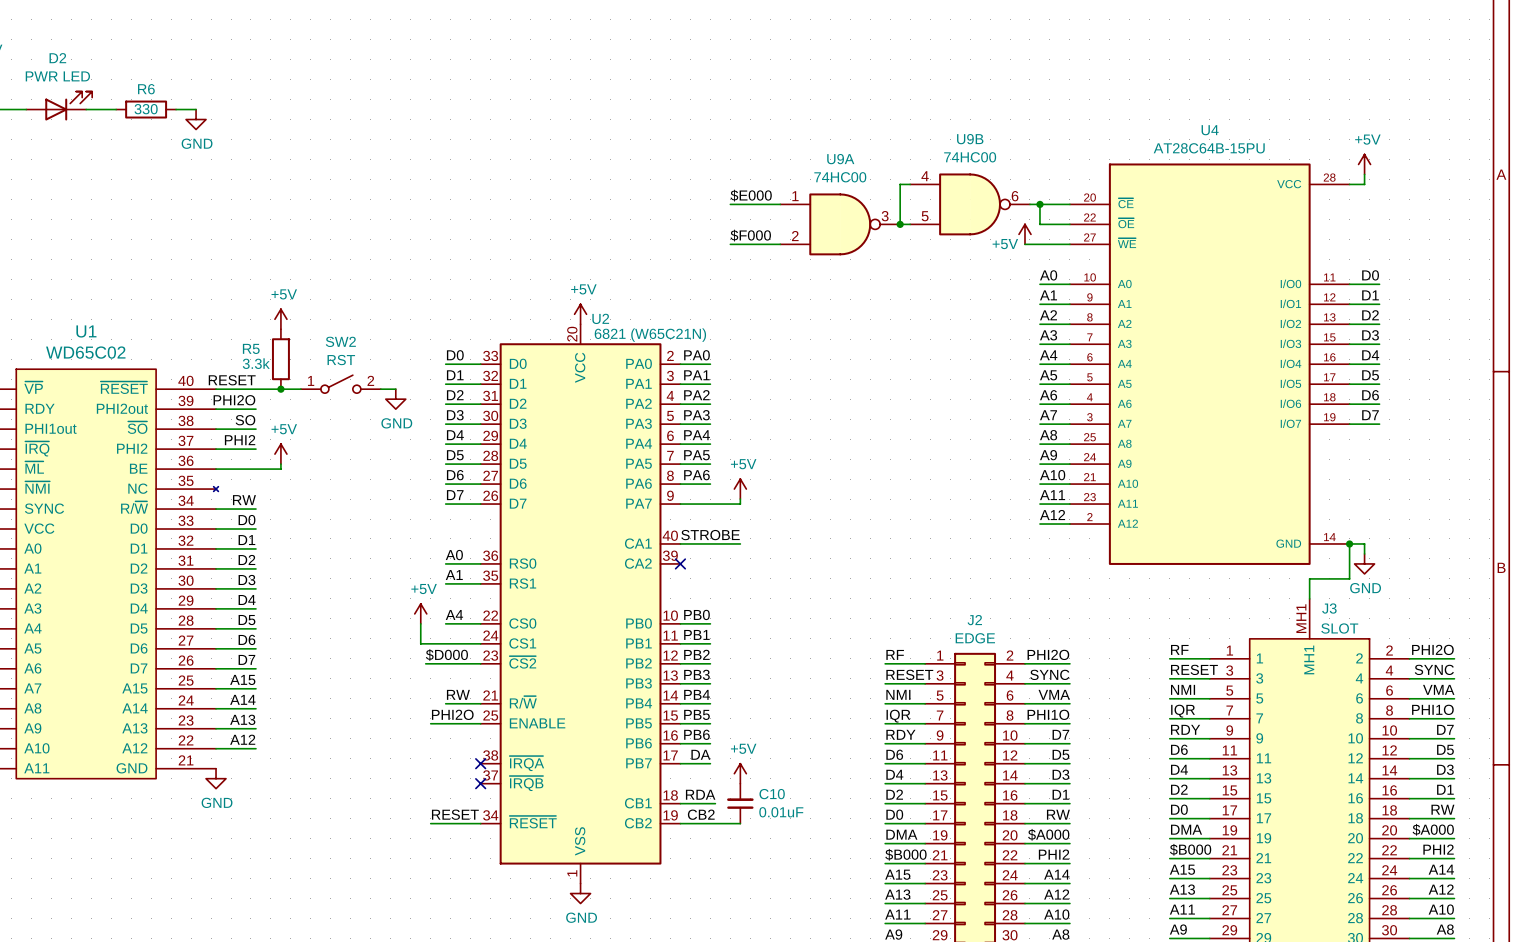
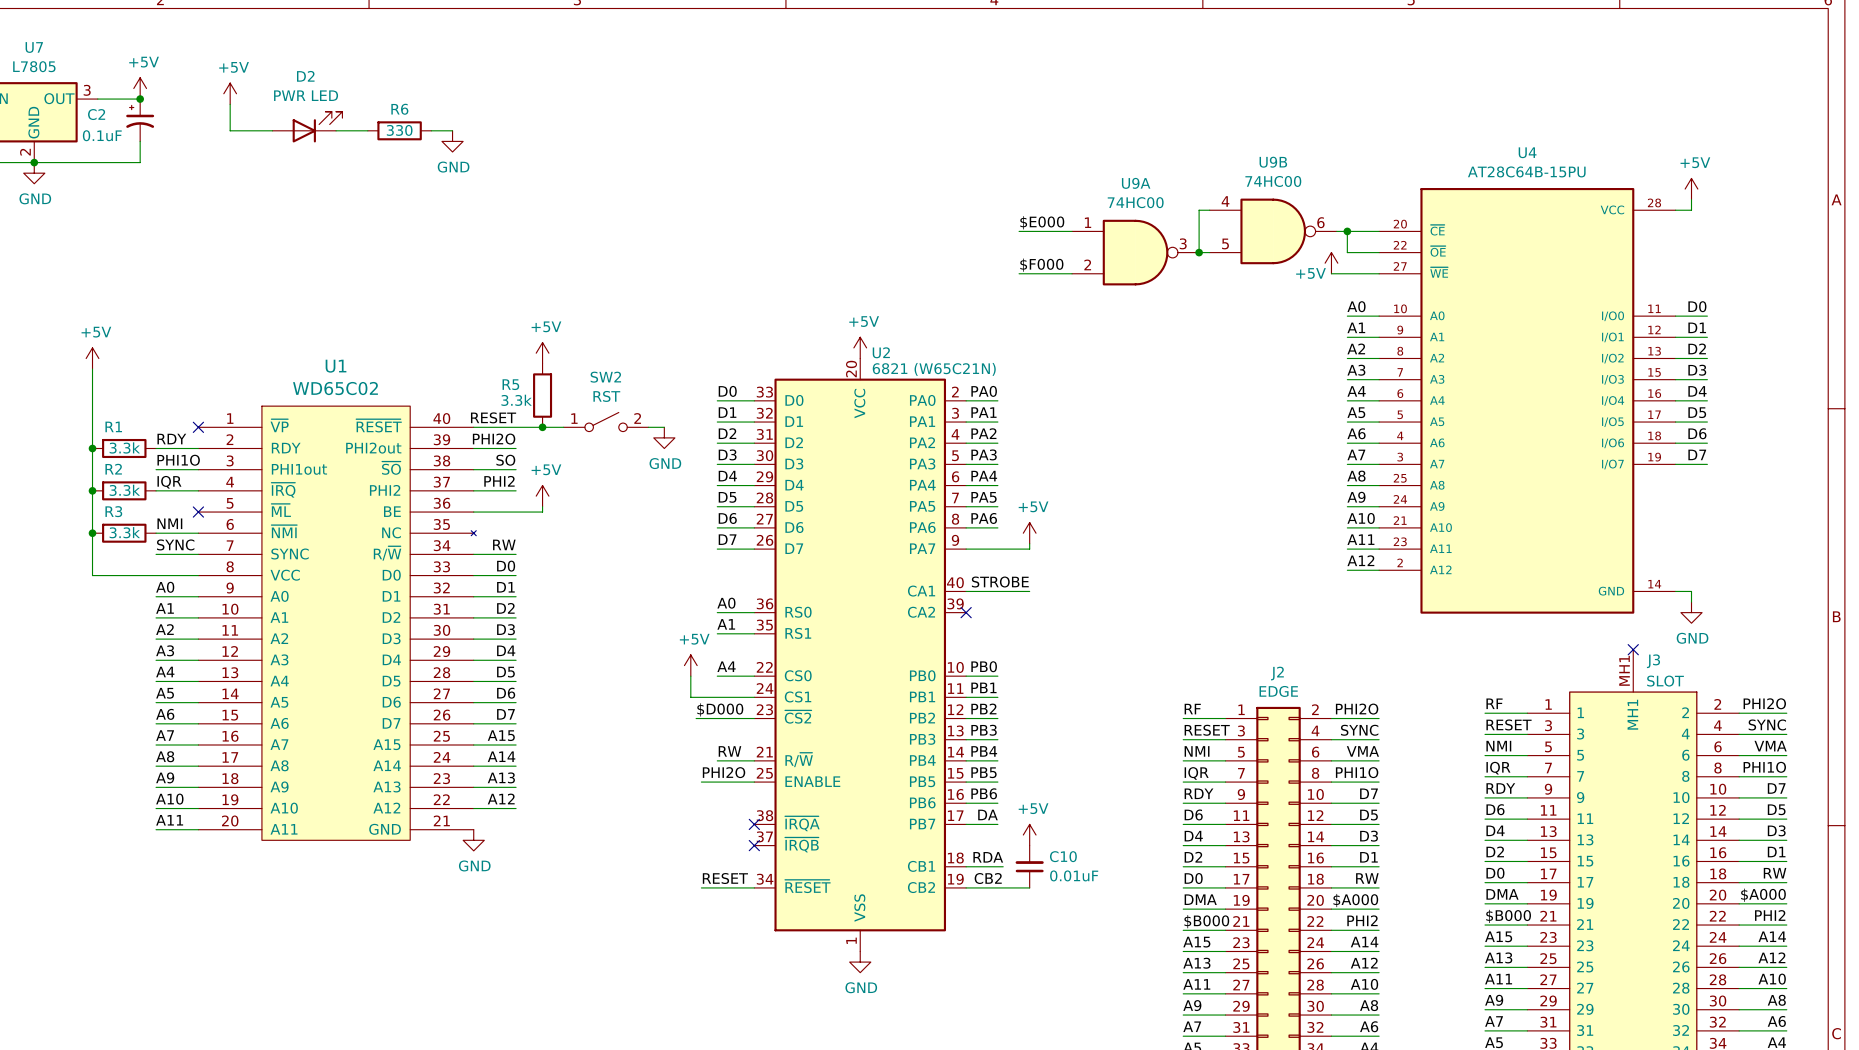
wire: (1349, 543) (1349, 578) (1309, 578) (1309, 598) -> none
junction: (1349, 543) -> none
no-connect mark: none -> (1633, 649)

